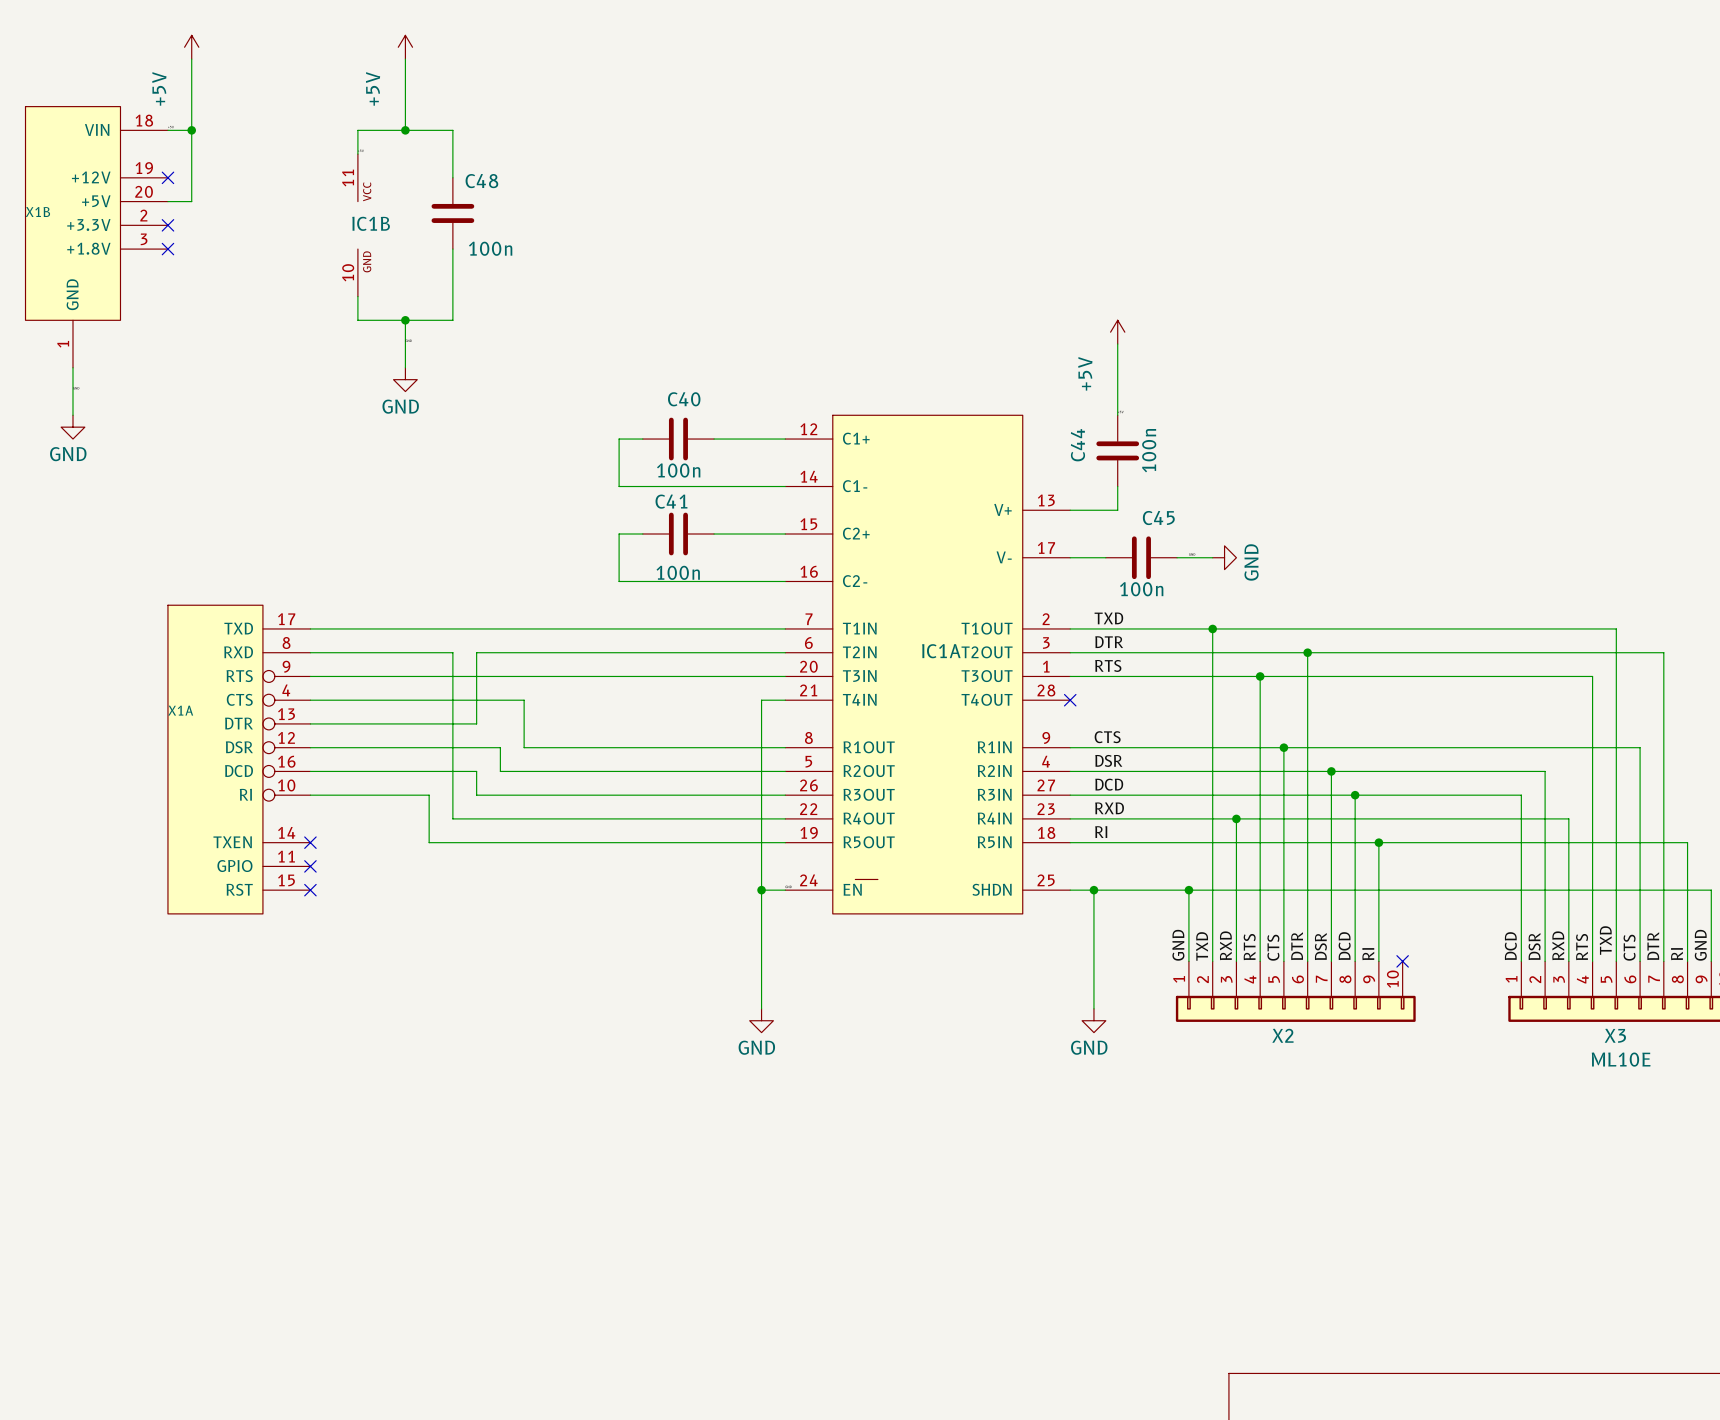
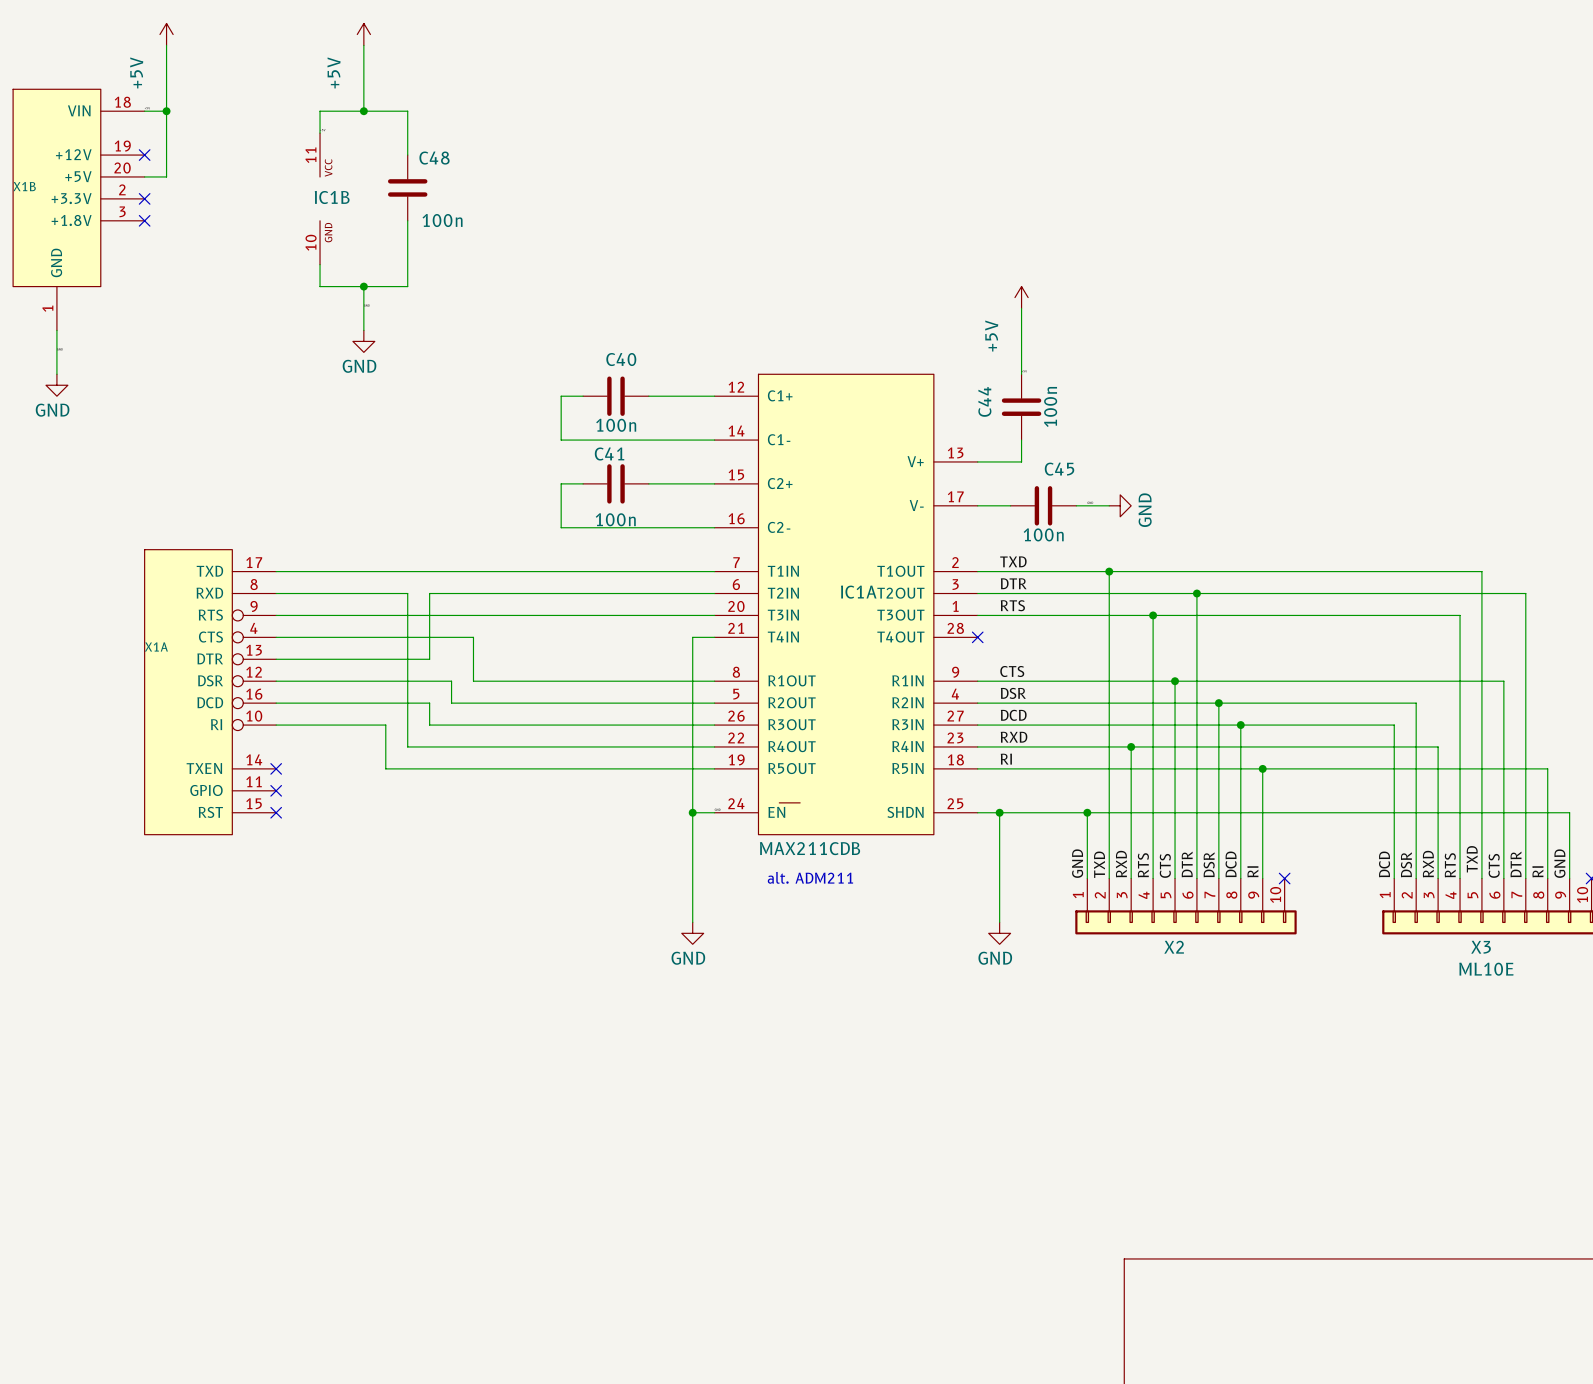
IC1A value: none -> MAX211CDB (810, 848)
text: none -> alt. ADM211 (810, 877)

